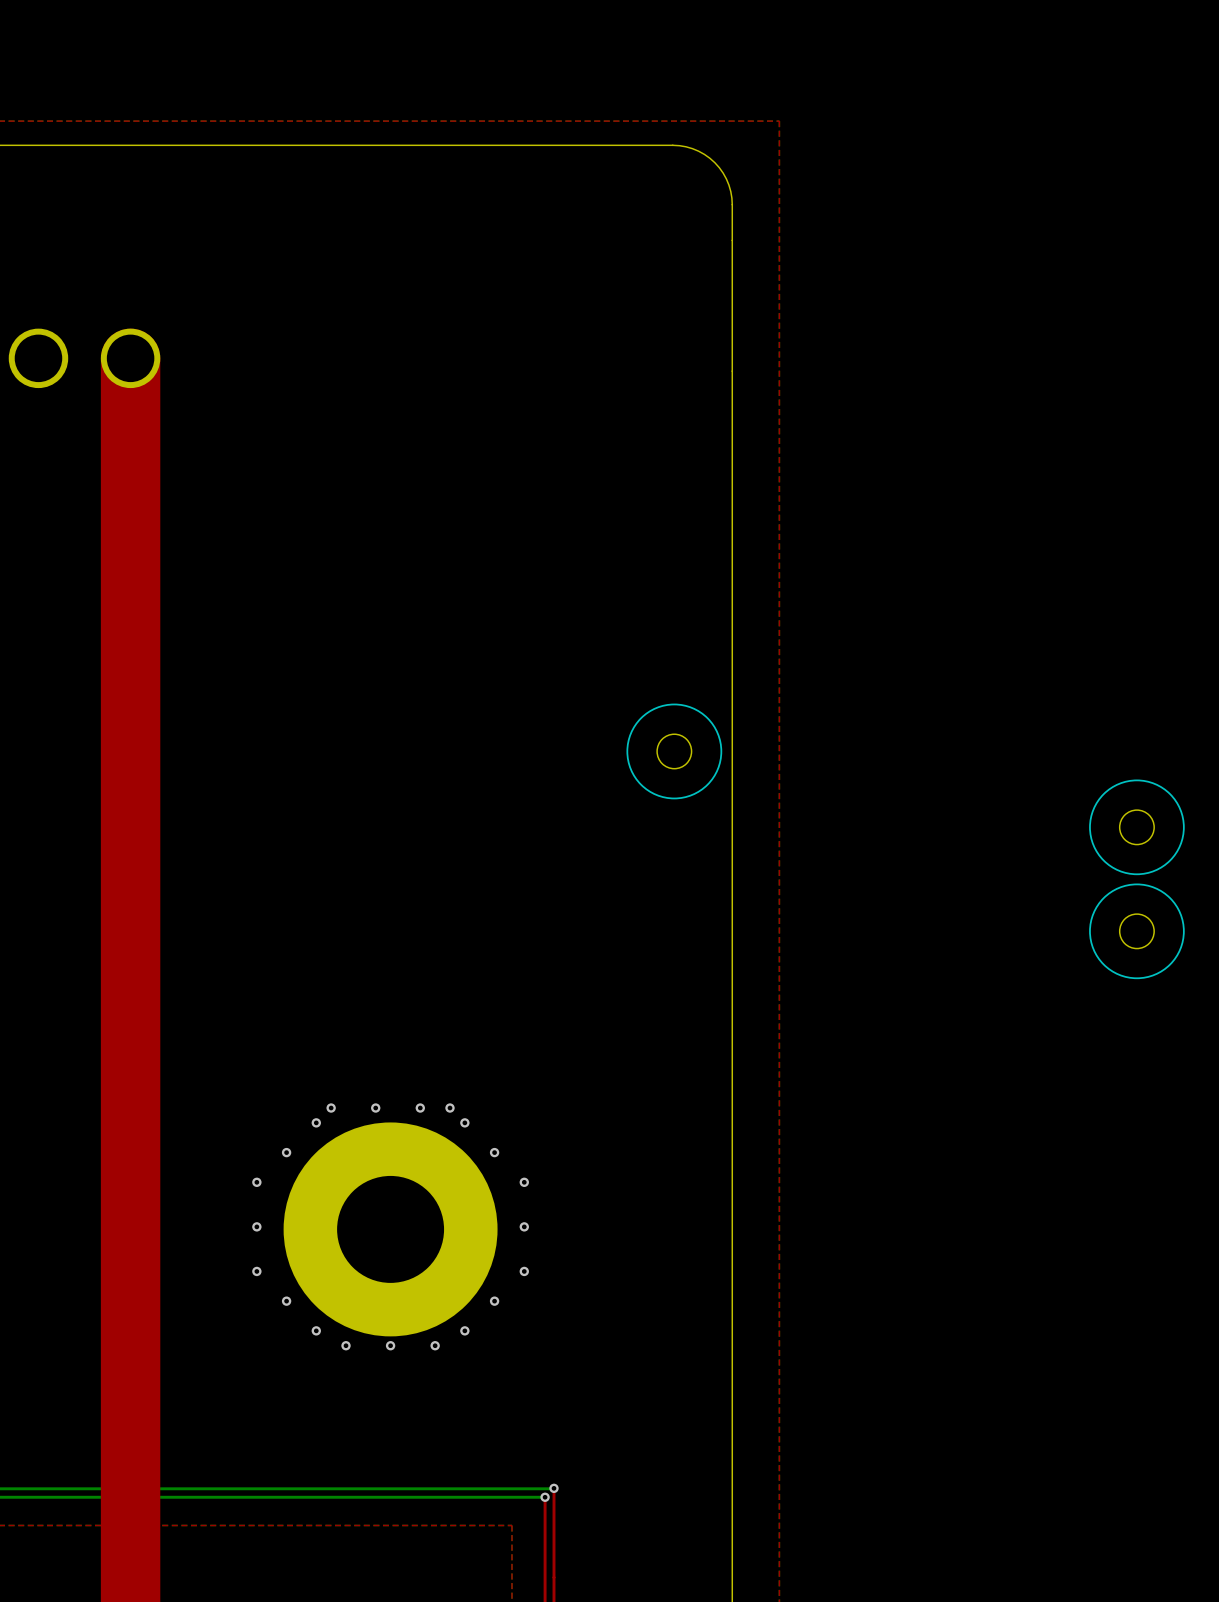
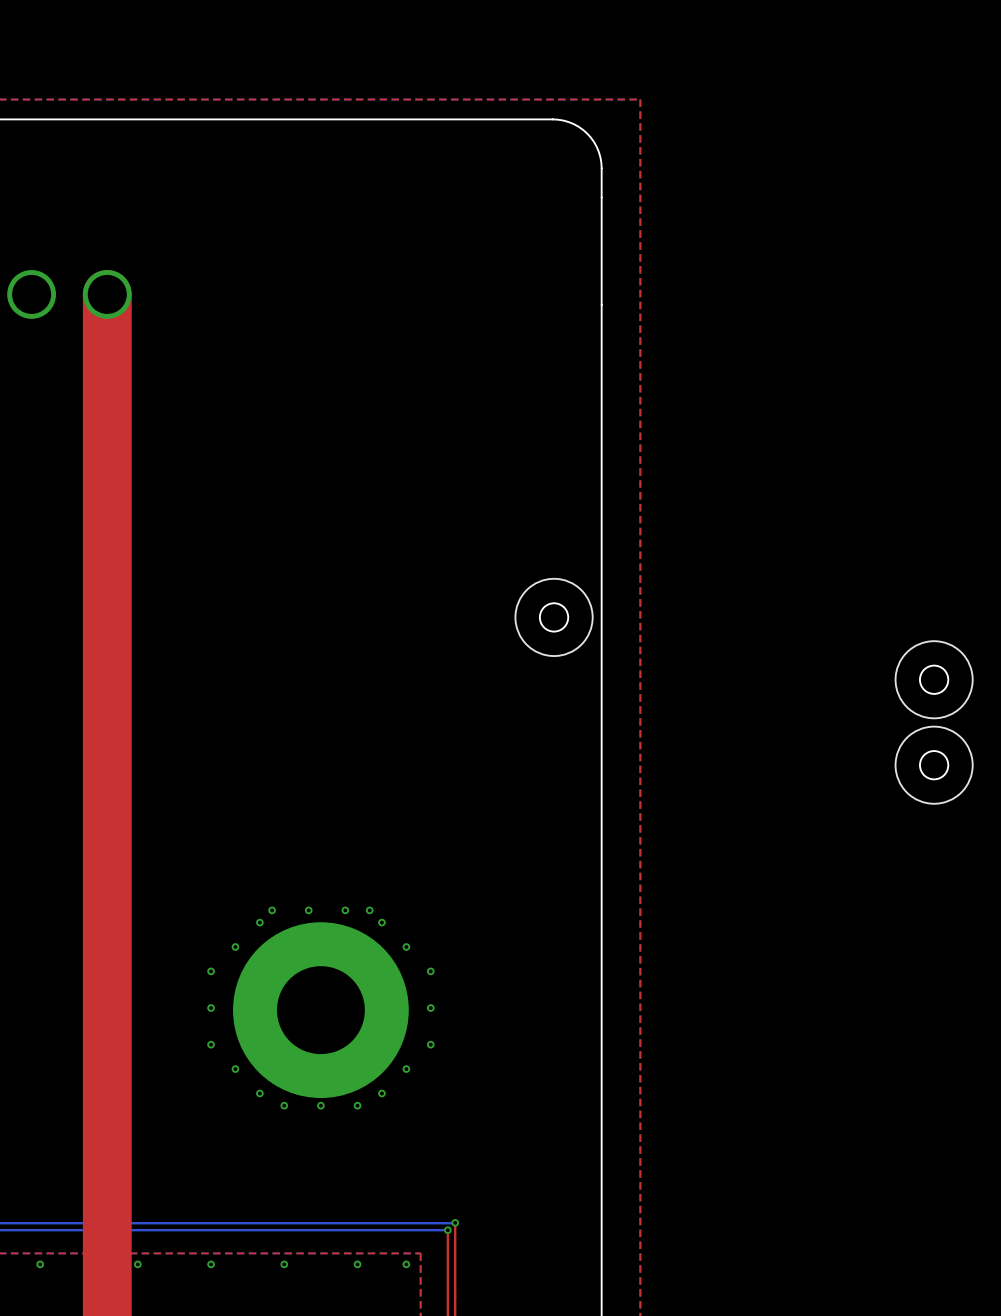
via: none -> (40, 1264)
via: none -> (137, 1264)
via: none -> (211, 1264)
via: none -> (284, 1264)
via: none -> (357, 1264)
via: none -> (406, 1264)

